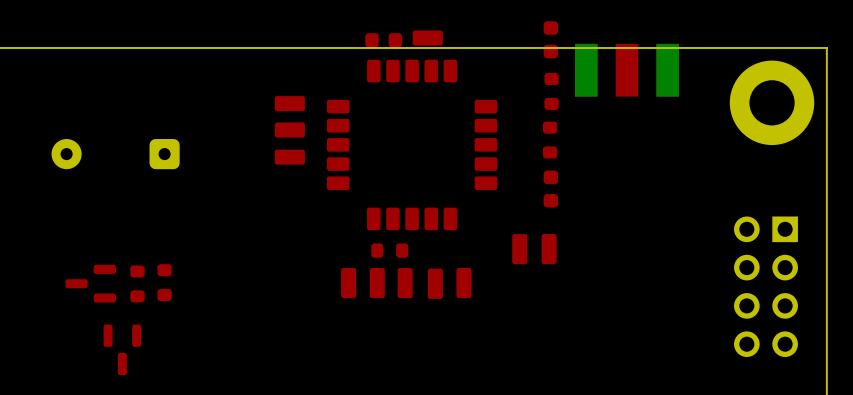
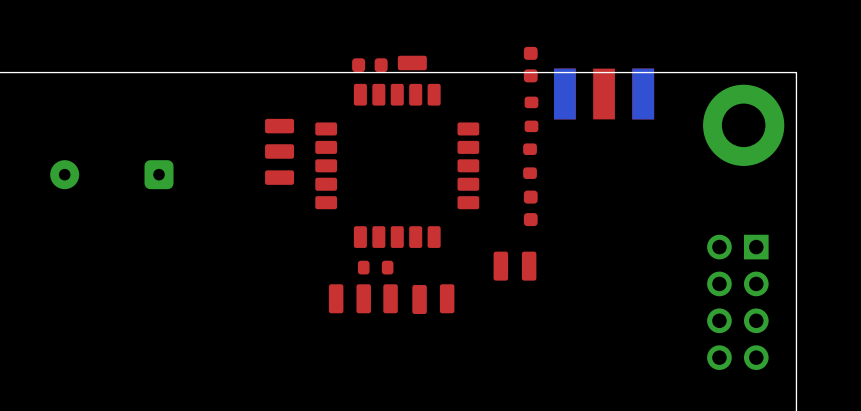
part: (164, 282) -> none
part: (90, 283) -> none
part: (137, 283) -> none
part: (122, 349) -> none

